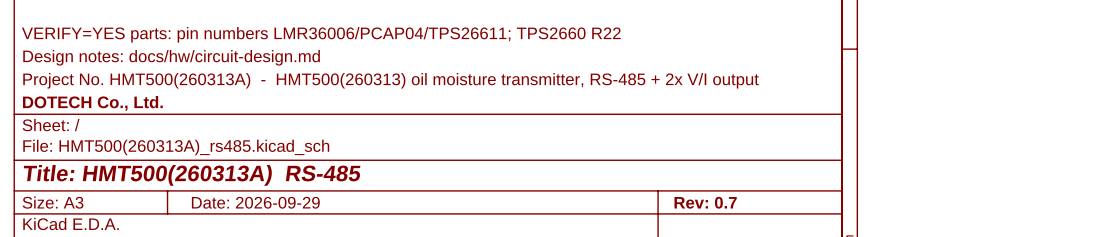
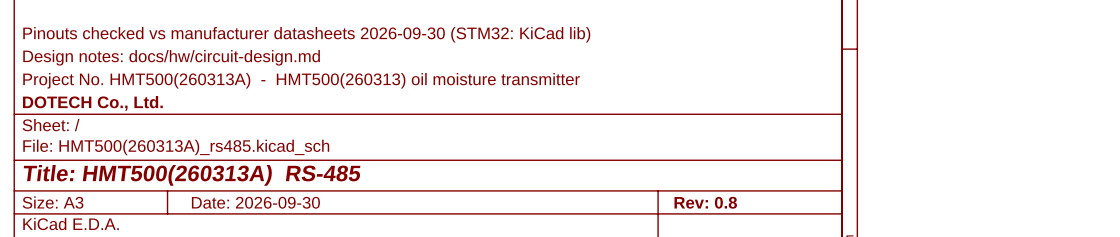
title block: VERIFY=YES parts: pin numbers LMR36006/PCAP04/TPS26611; TPS2660 R22 (321, 34) -> Pinouts checked vs manufacturer datasheets 2026-09-30 (STM32: KiCad lib) (306, 34)
title block: Project No. HMT500(260313A) - HMT500(260313) oil moisture transmitter, RS-485 + 2x V/I output (391, 80) -> Project No. HMT500(260313A) - HMT500(260313) oil moisture transmitter (301, 80)
title block: Date: 2026-09-29 (255, 202) -> Date: 2026-09-30 (255, 202)
title block: Rev: 0.7 (705, 202) -> Rev: 0.8 (705, 202)

